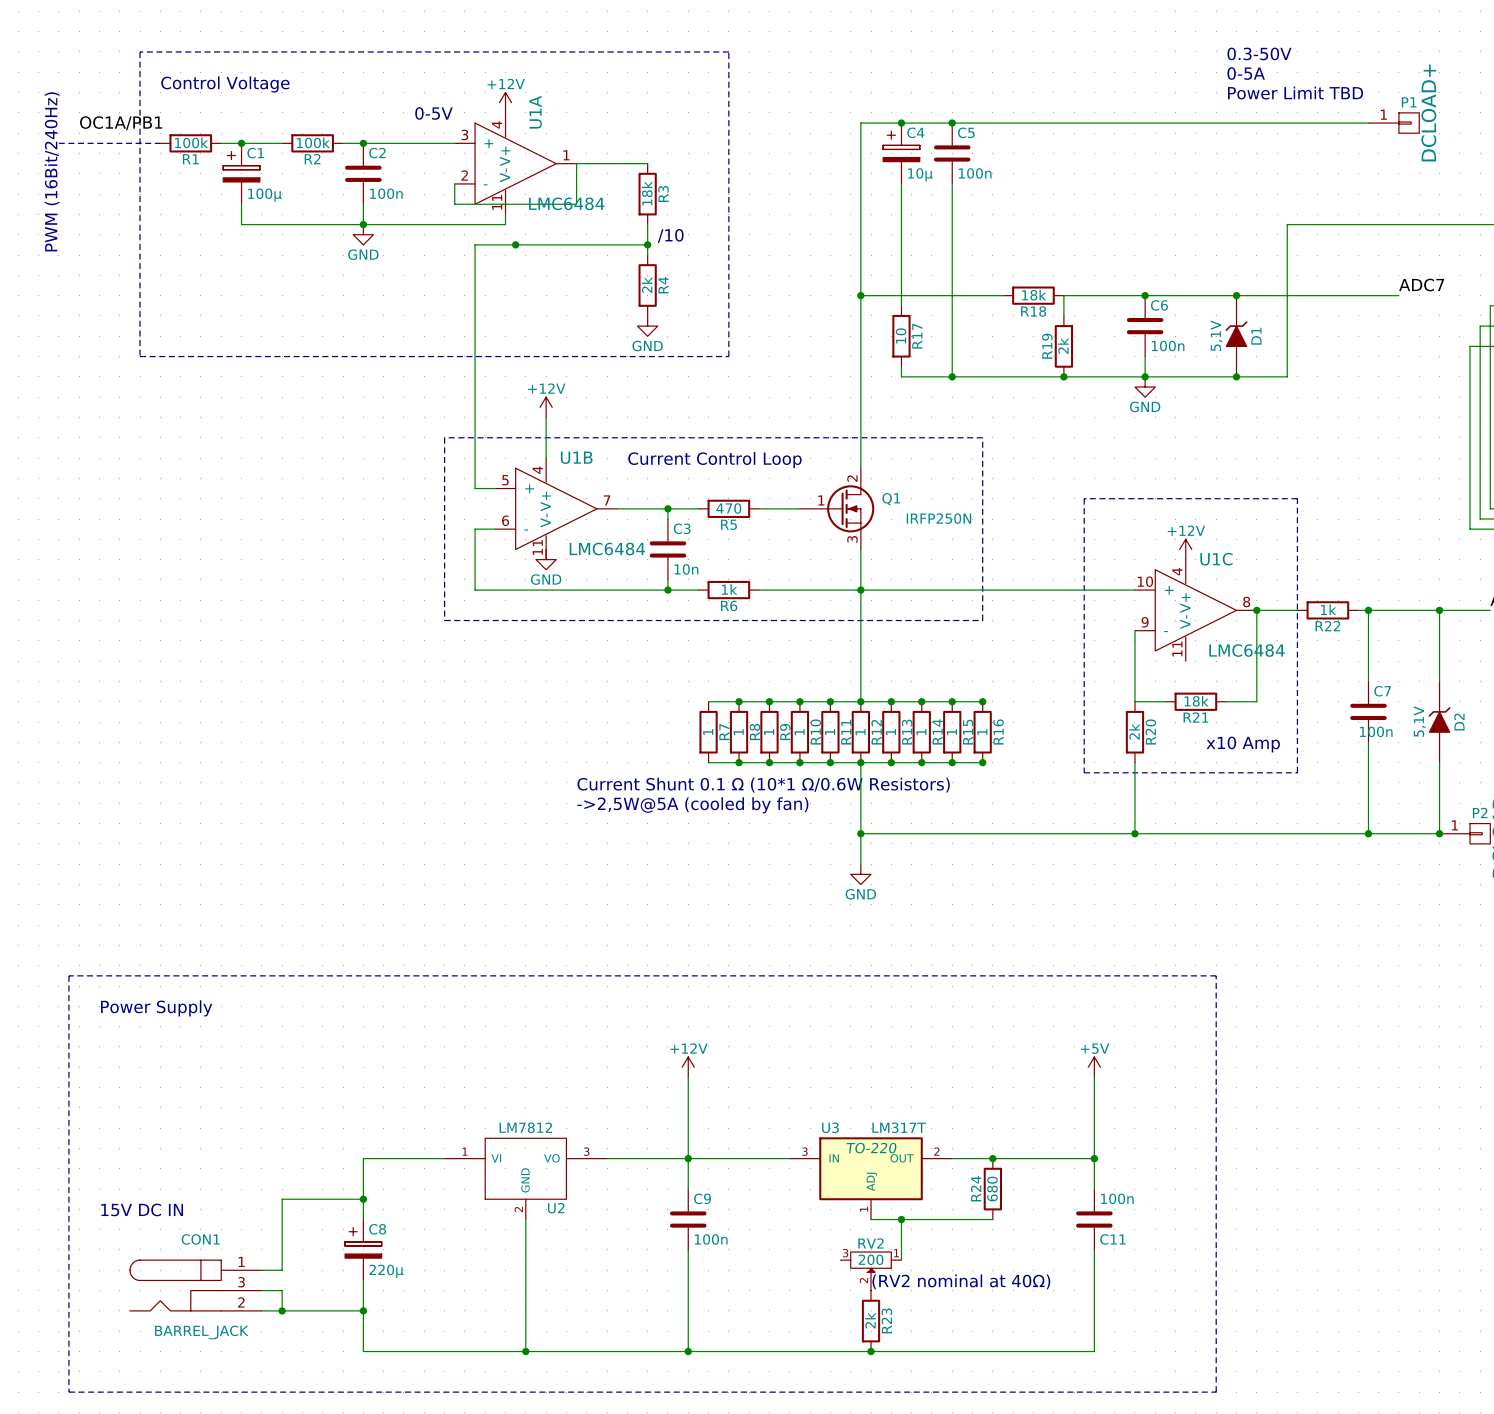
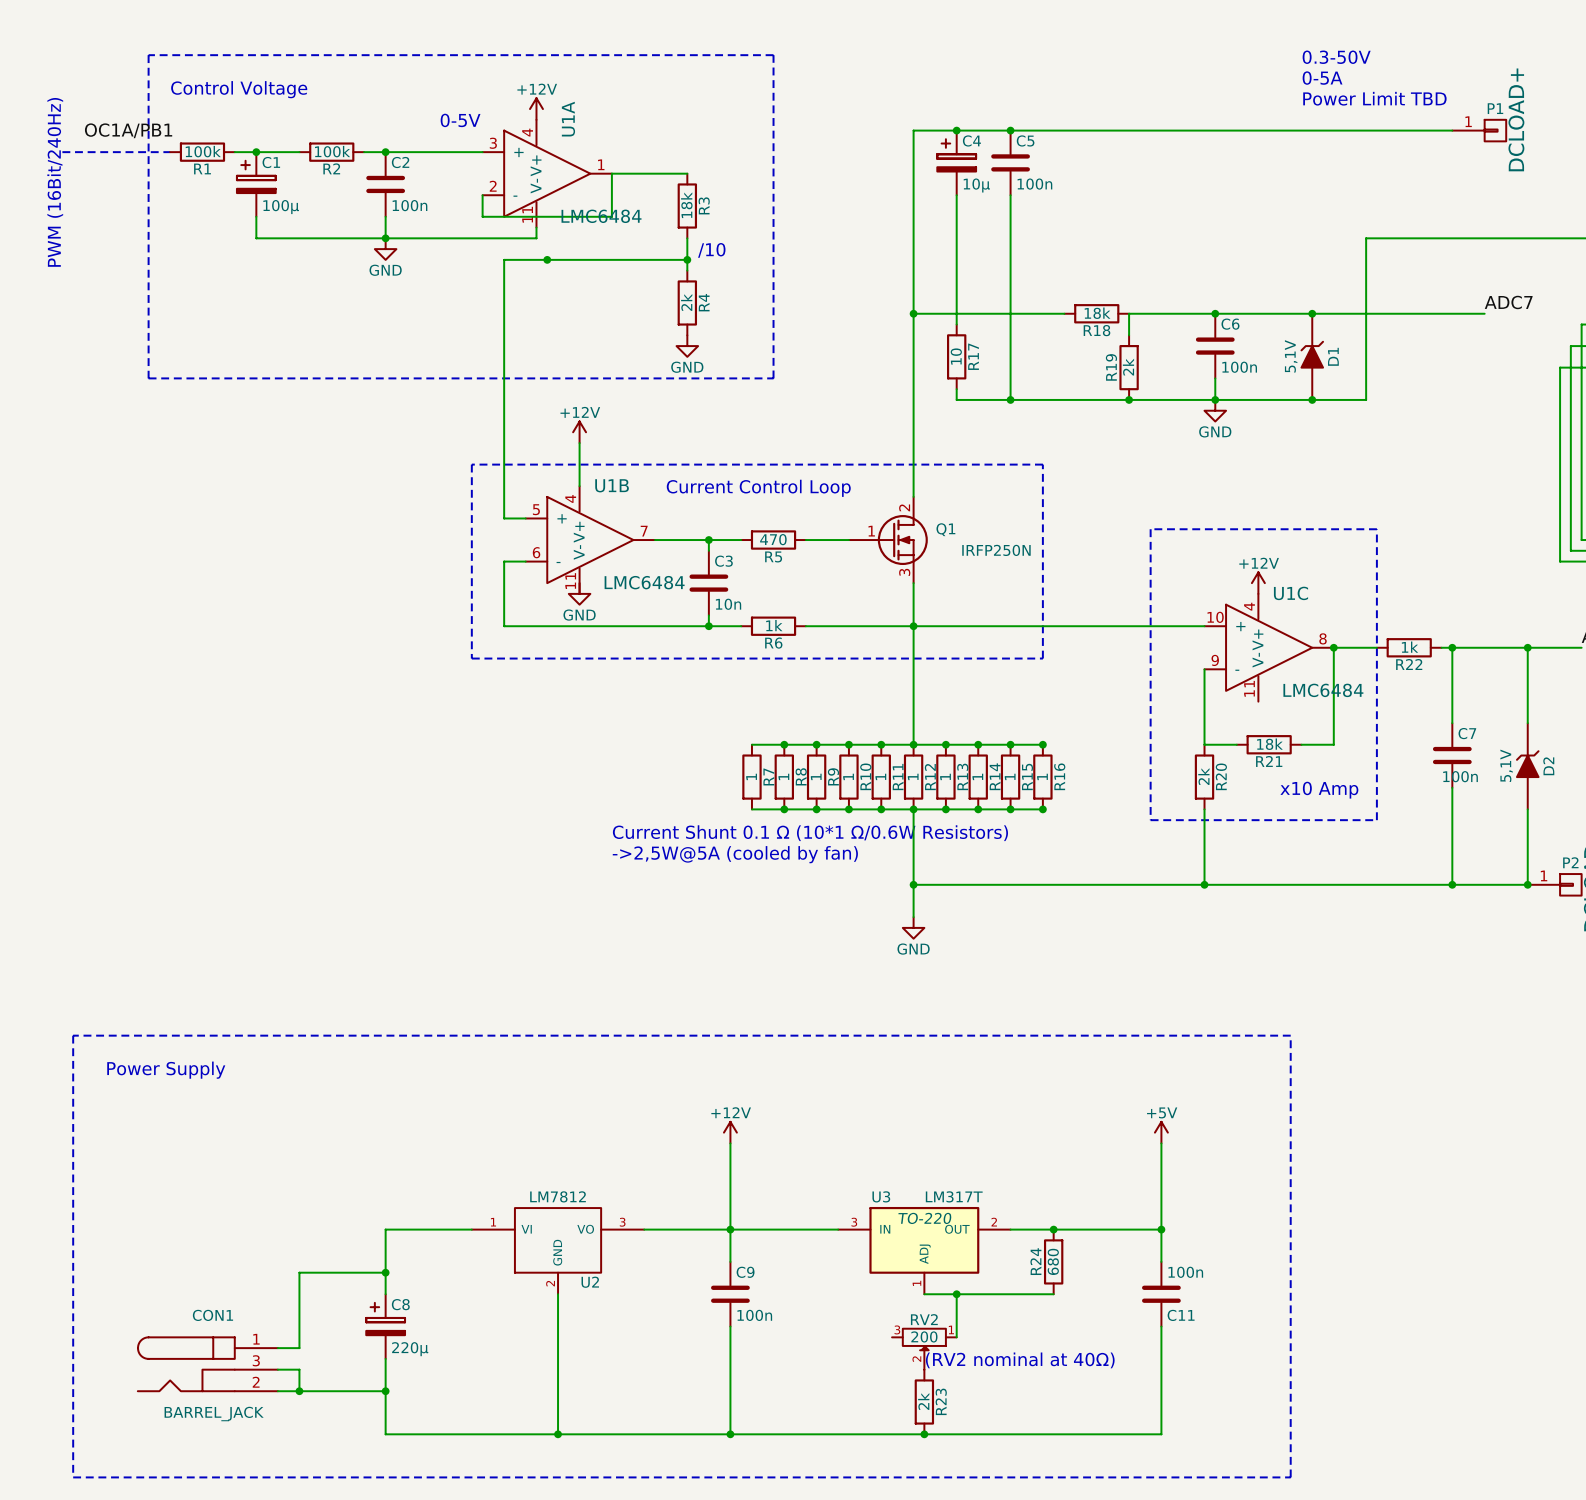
text: 15V DC IN (142, 1209) -> none

